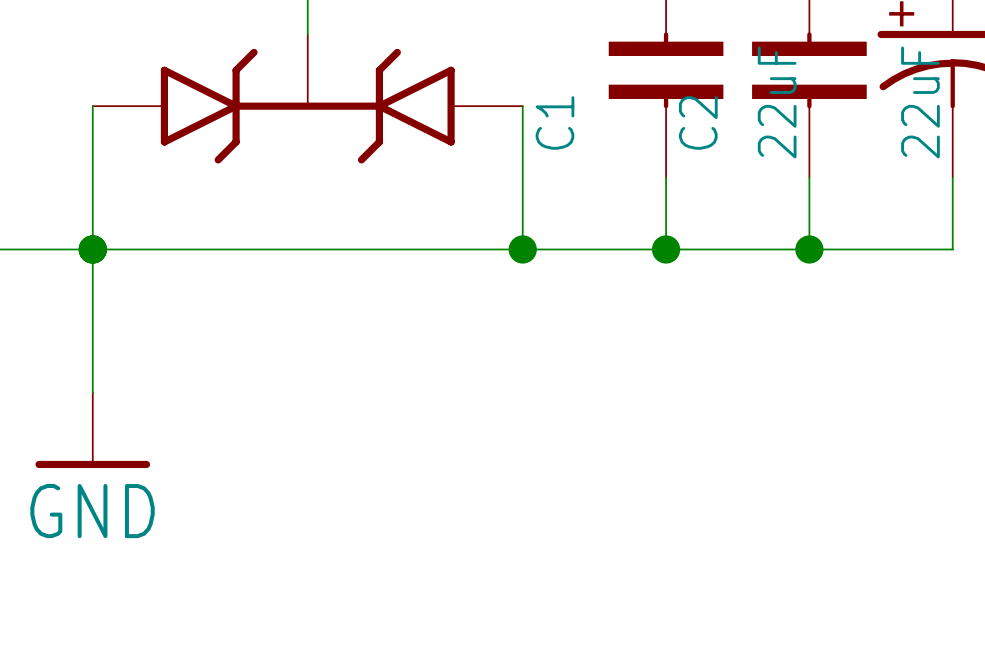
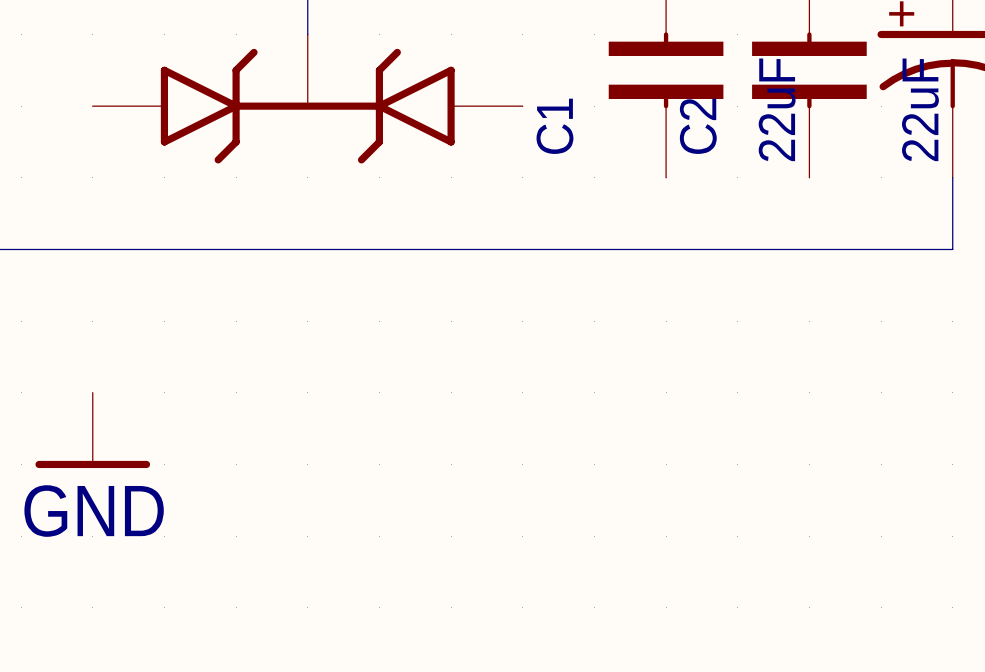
wire: (92, 106) (92, 392) -> none
wire: (522, 106) (522, 249) -> none
wire: (666, 177) (666, 249) -> none
wire: (809, 177) (809, 249) -> none
junction: (92, 249) -> none
junction: (522, 249) -> none
junction: (666, 249) -> none
junction: (809, 249) -> none

